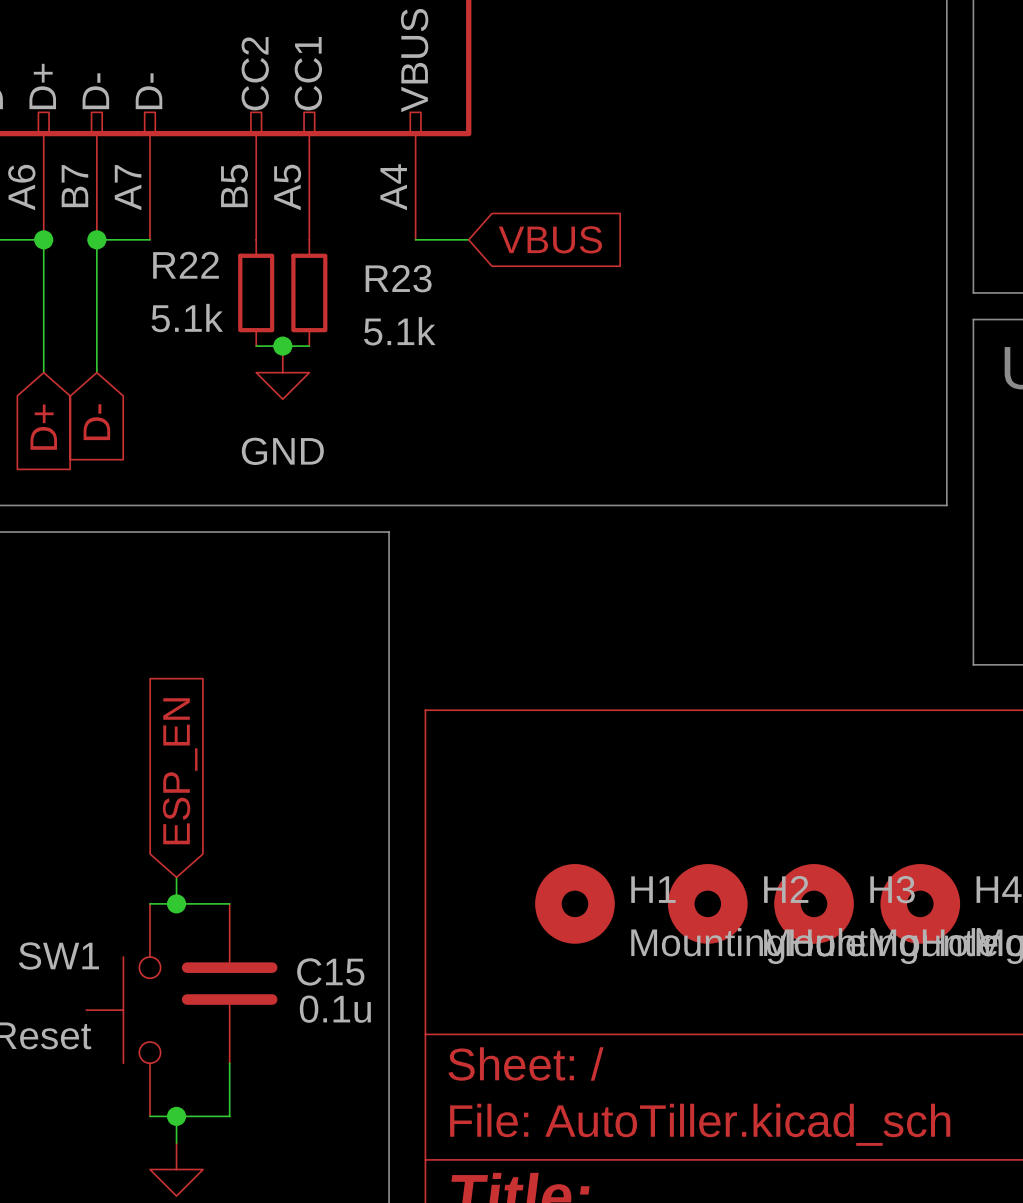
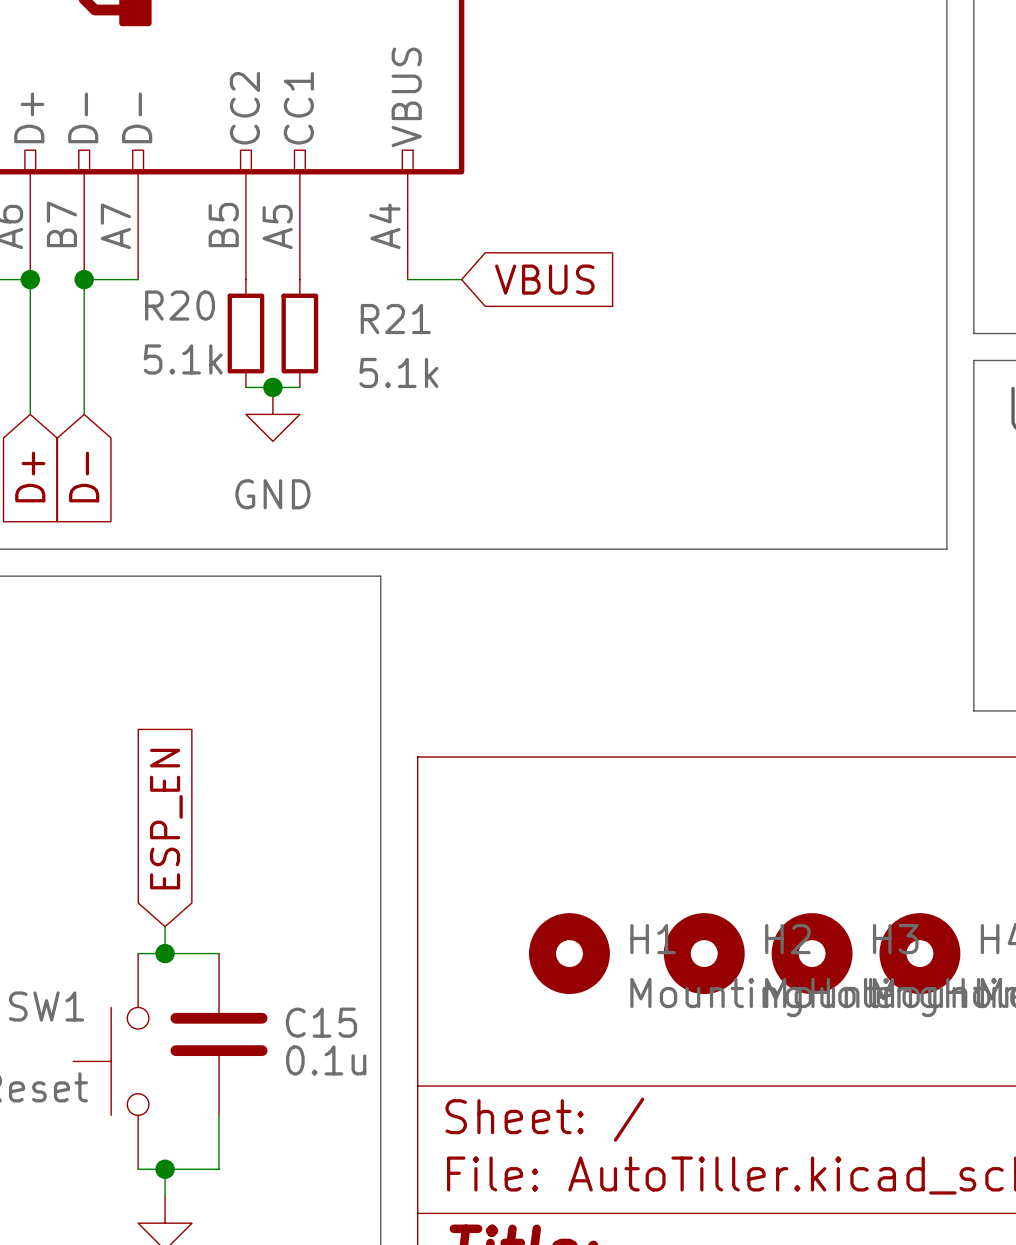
R22 name: R22 (186, 265) -> R20 (180, 305)
R23 name: R23 (398, 278) -> R21 (395, 319)

